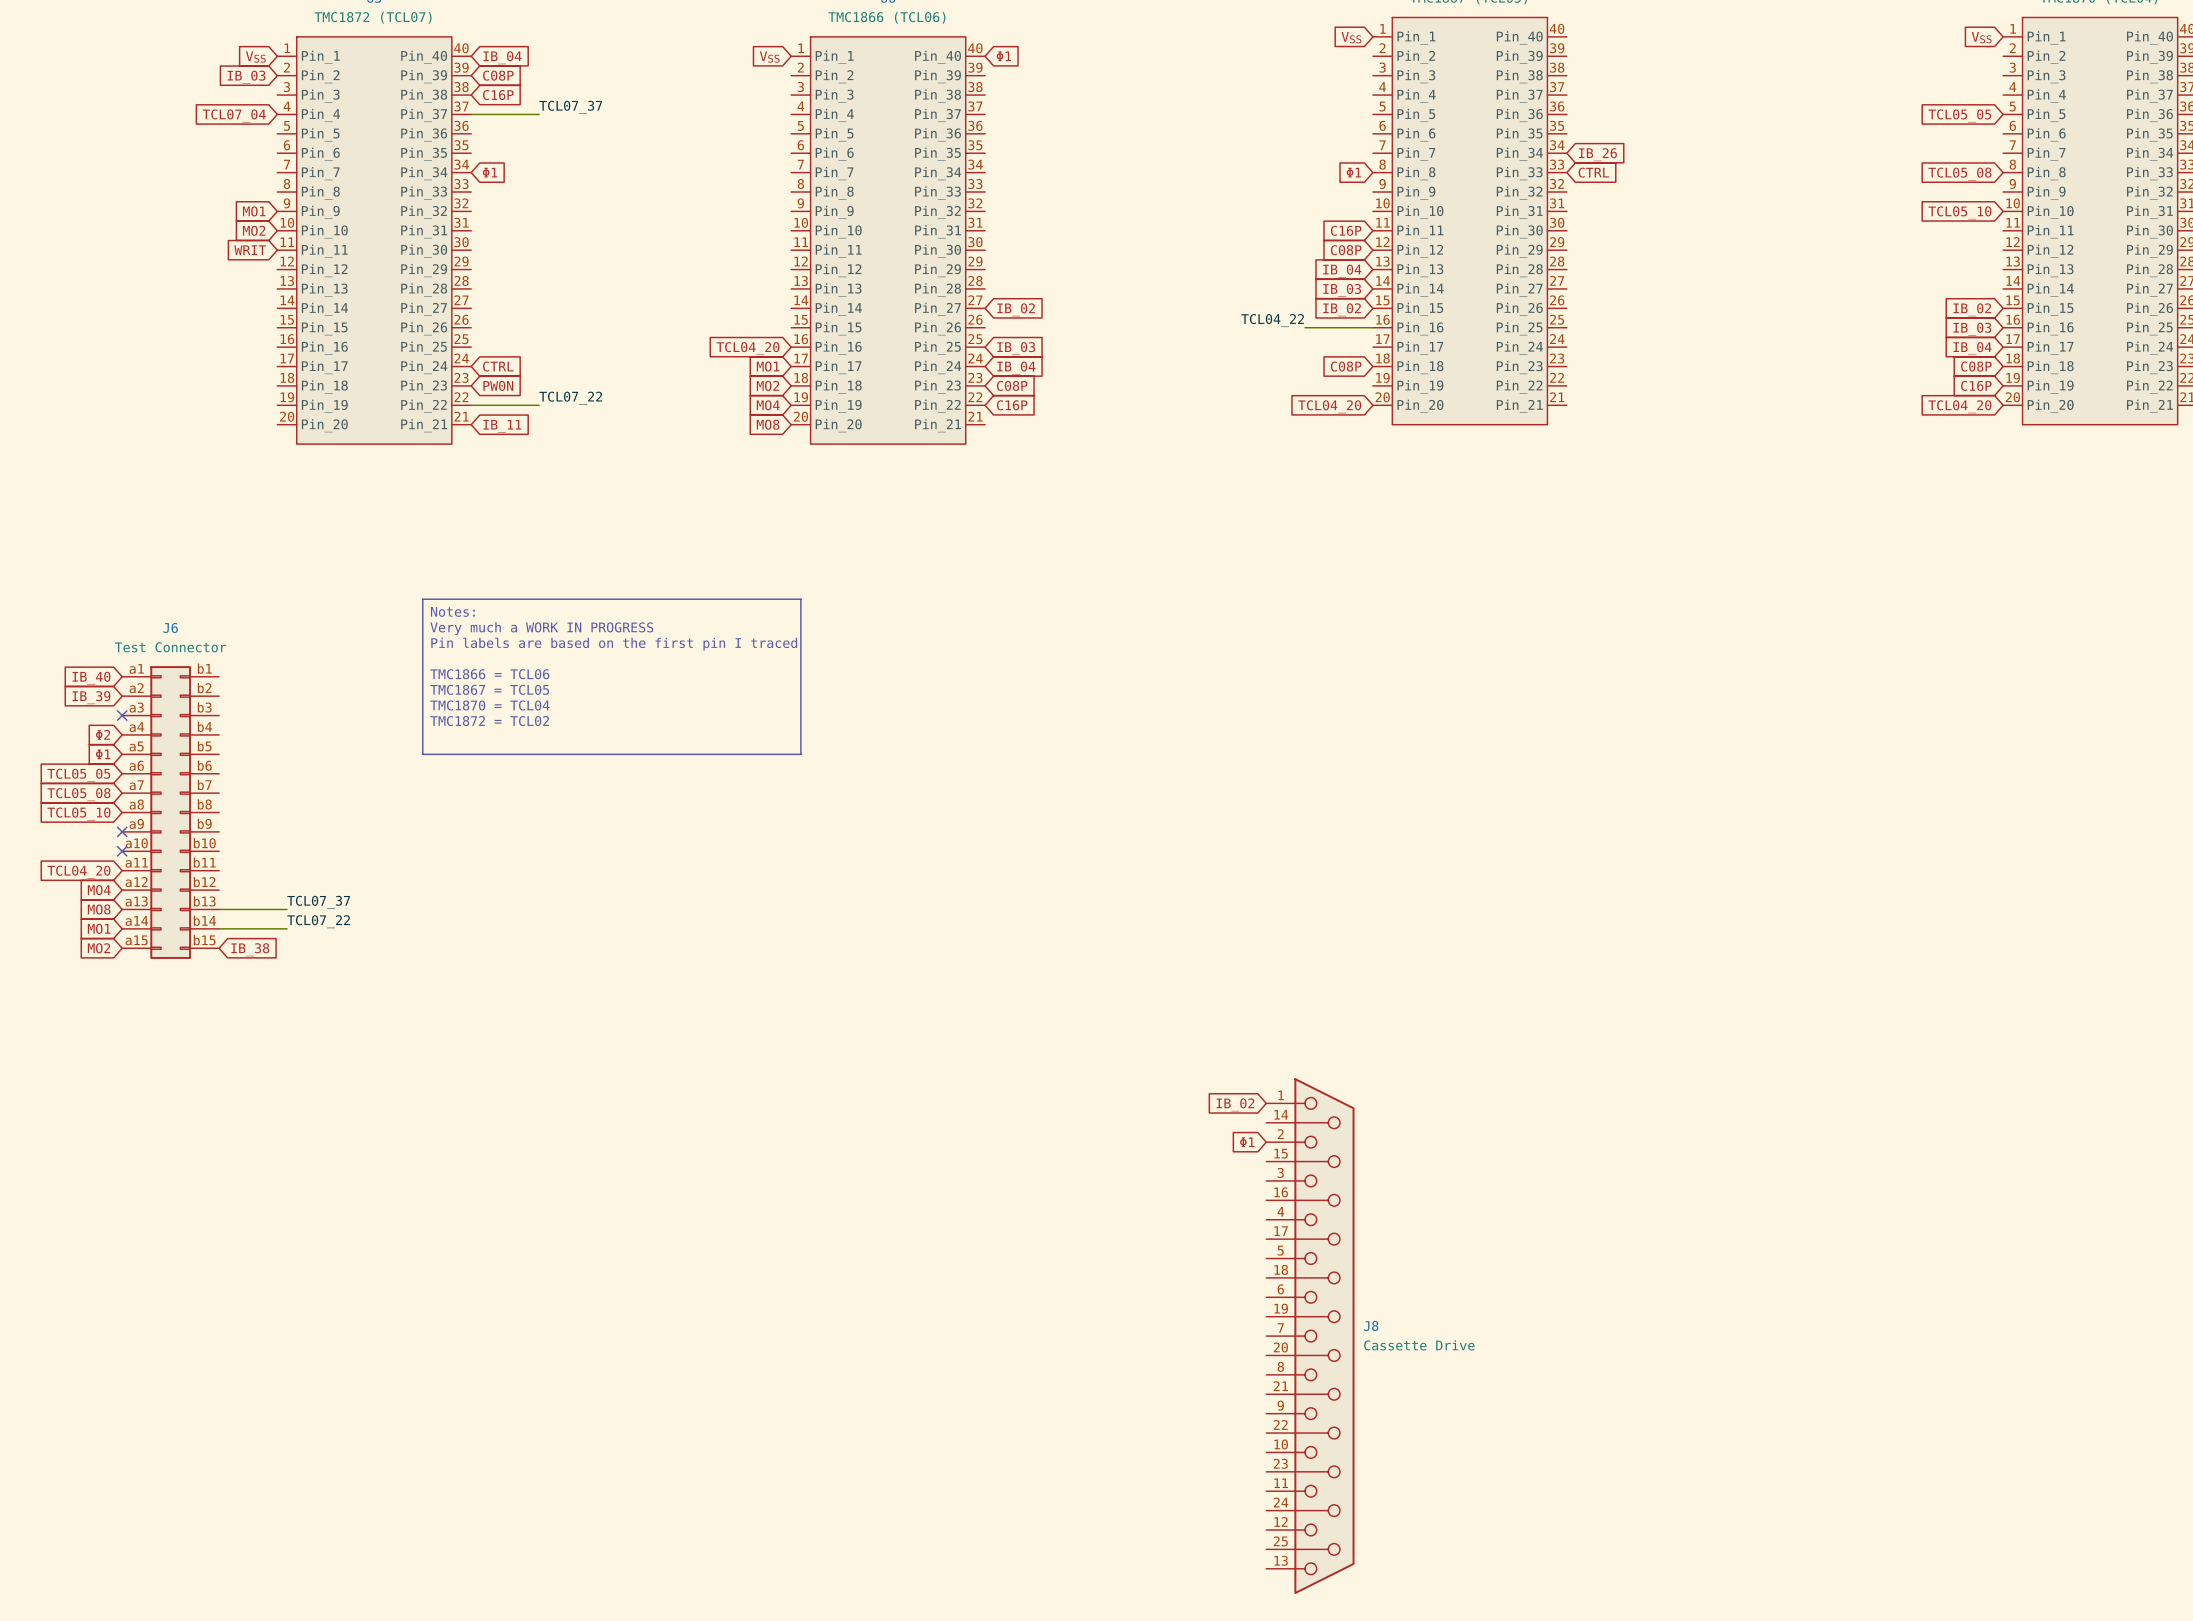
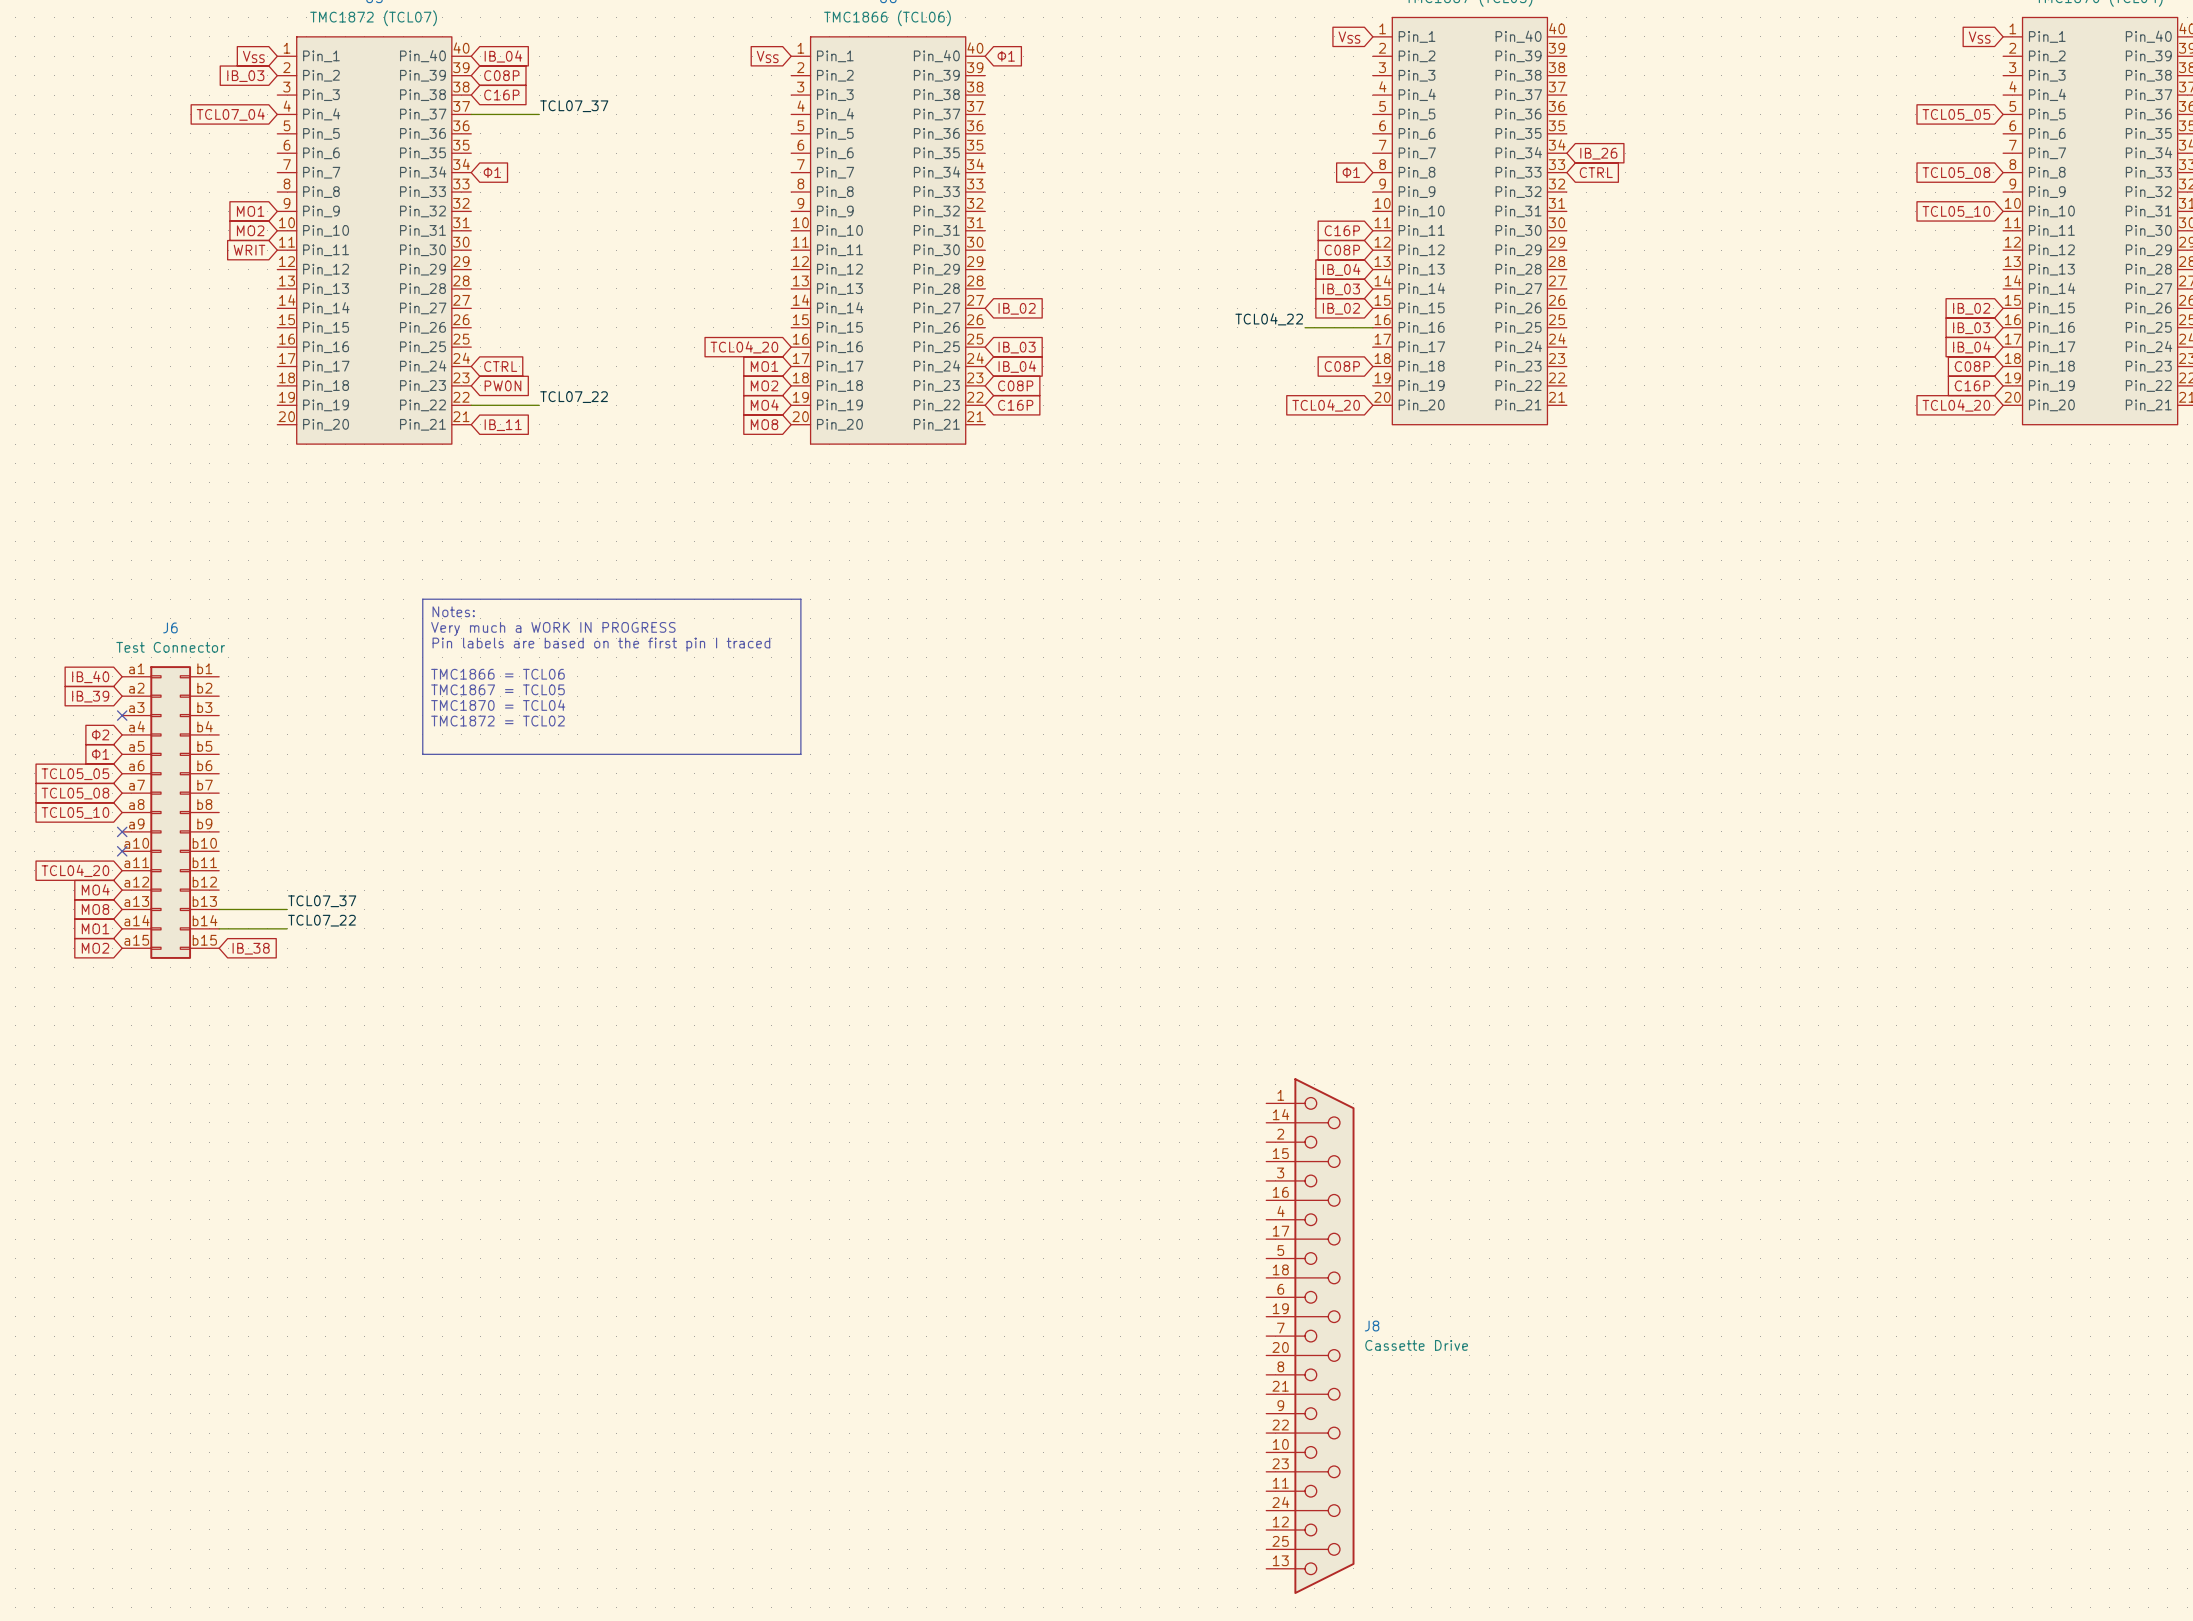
global label: IB_02 (1235, 1104) -> none
global label: Φ1 (1247, 1142) -> none

